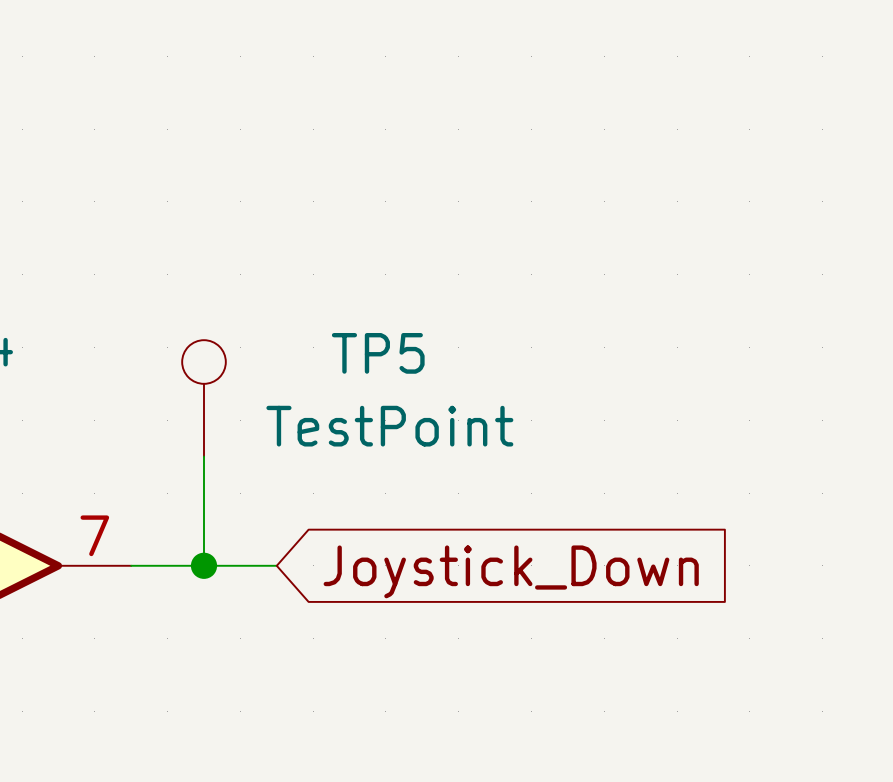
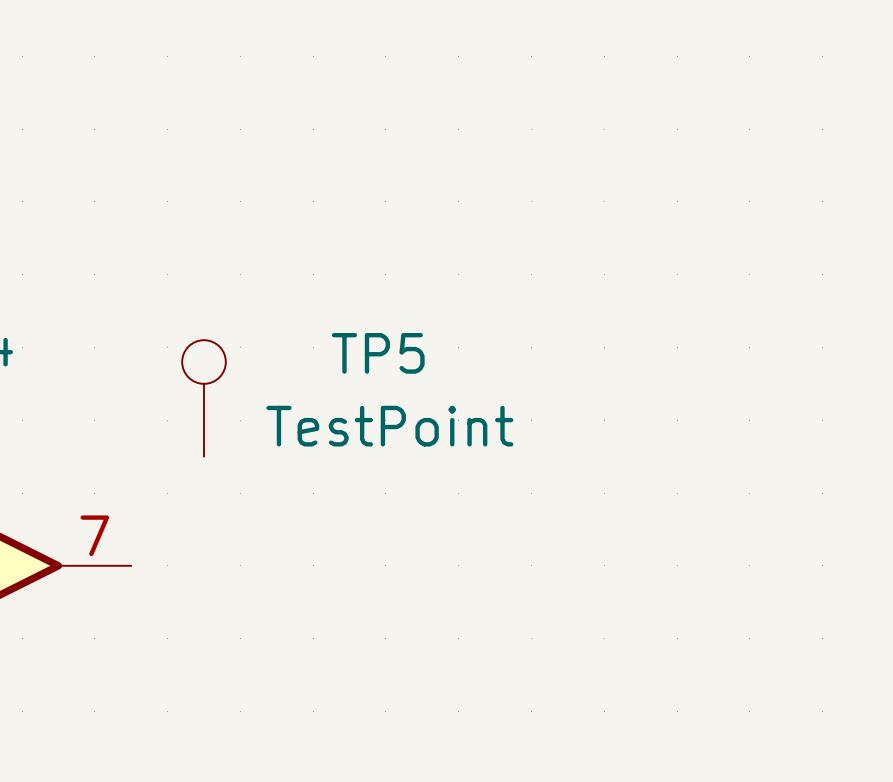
wire: (204, 456) (204, 565) -> none
wire: (131, 565) (276, 565) -> none
junction: (204, 565) -> none
global label: Joystick_Down (511, 571) -> none

